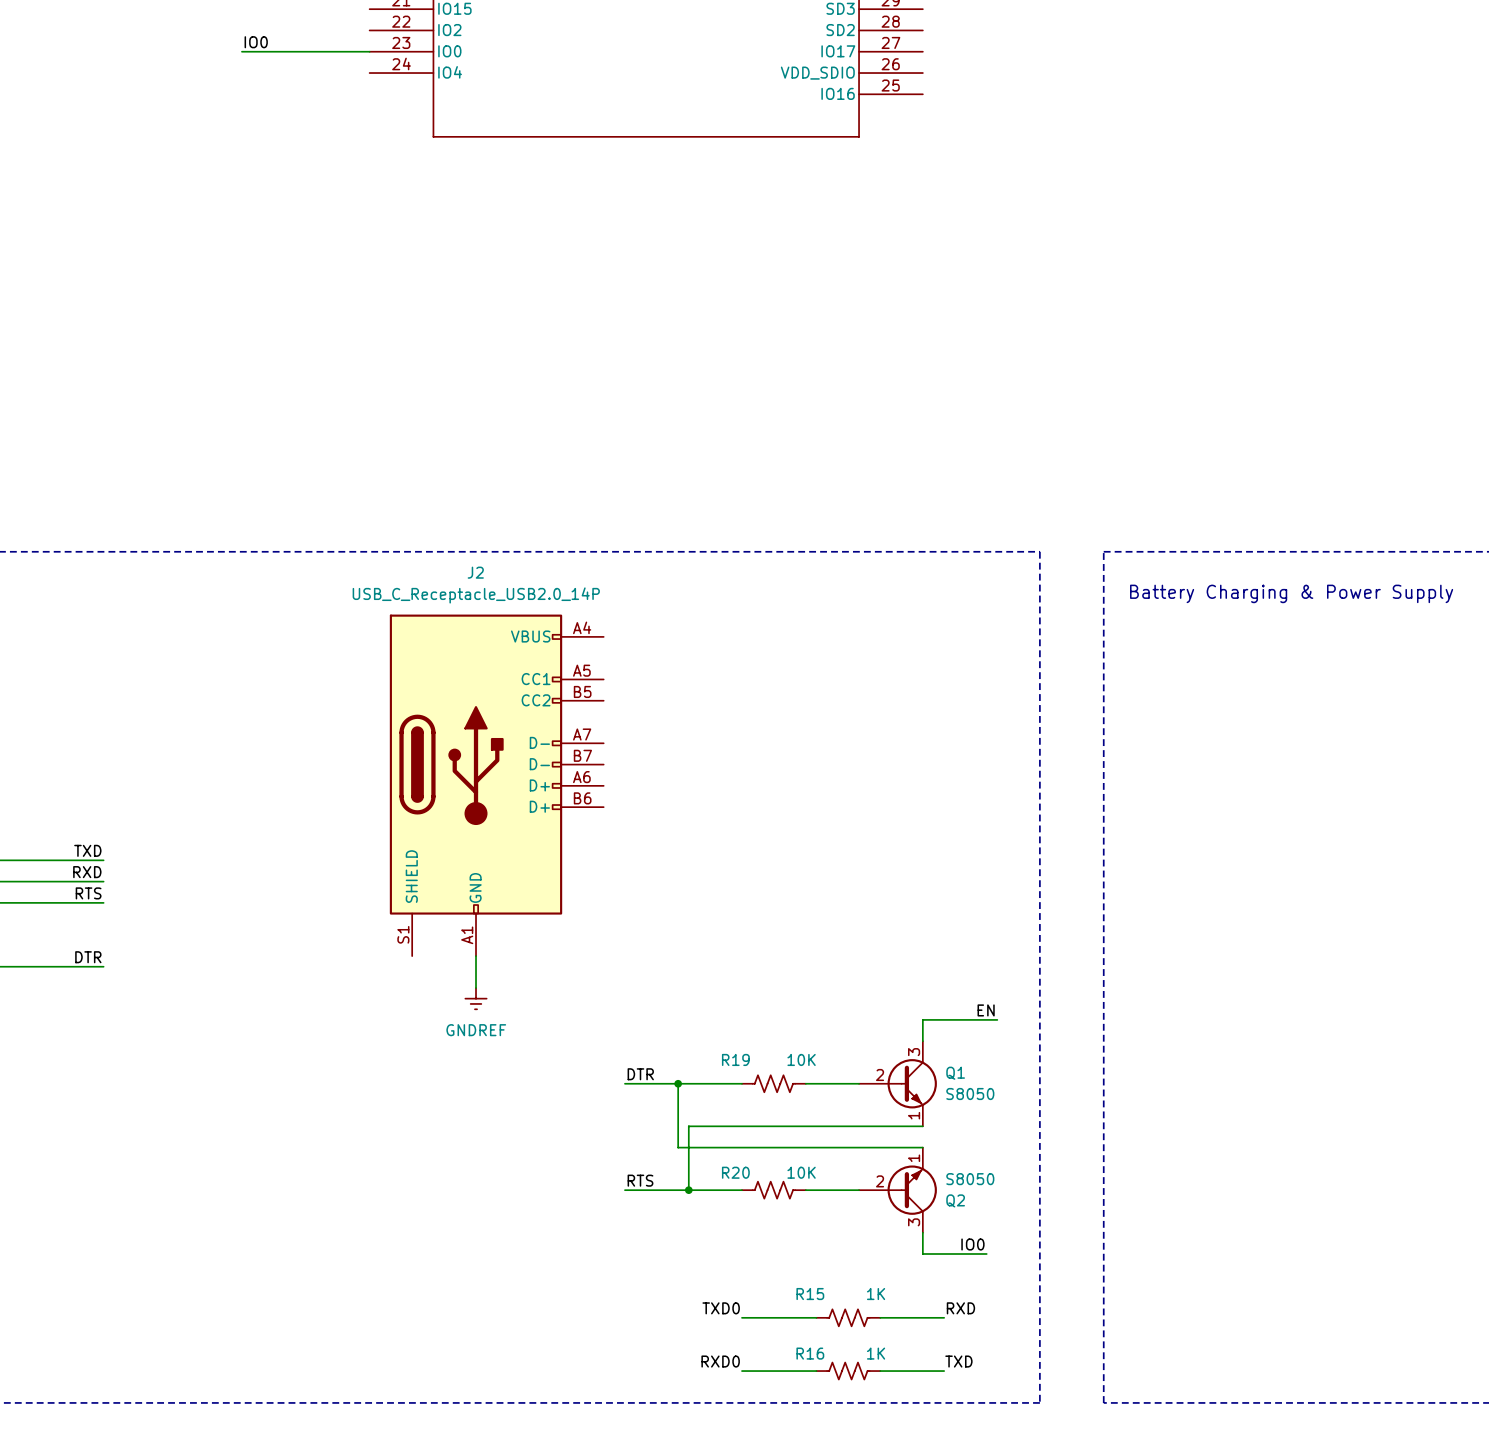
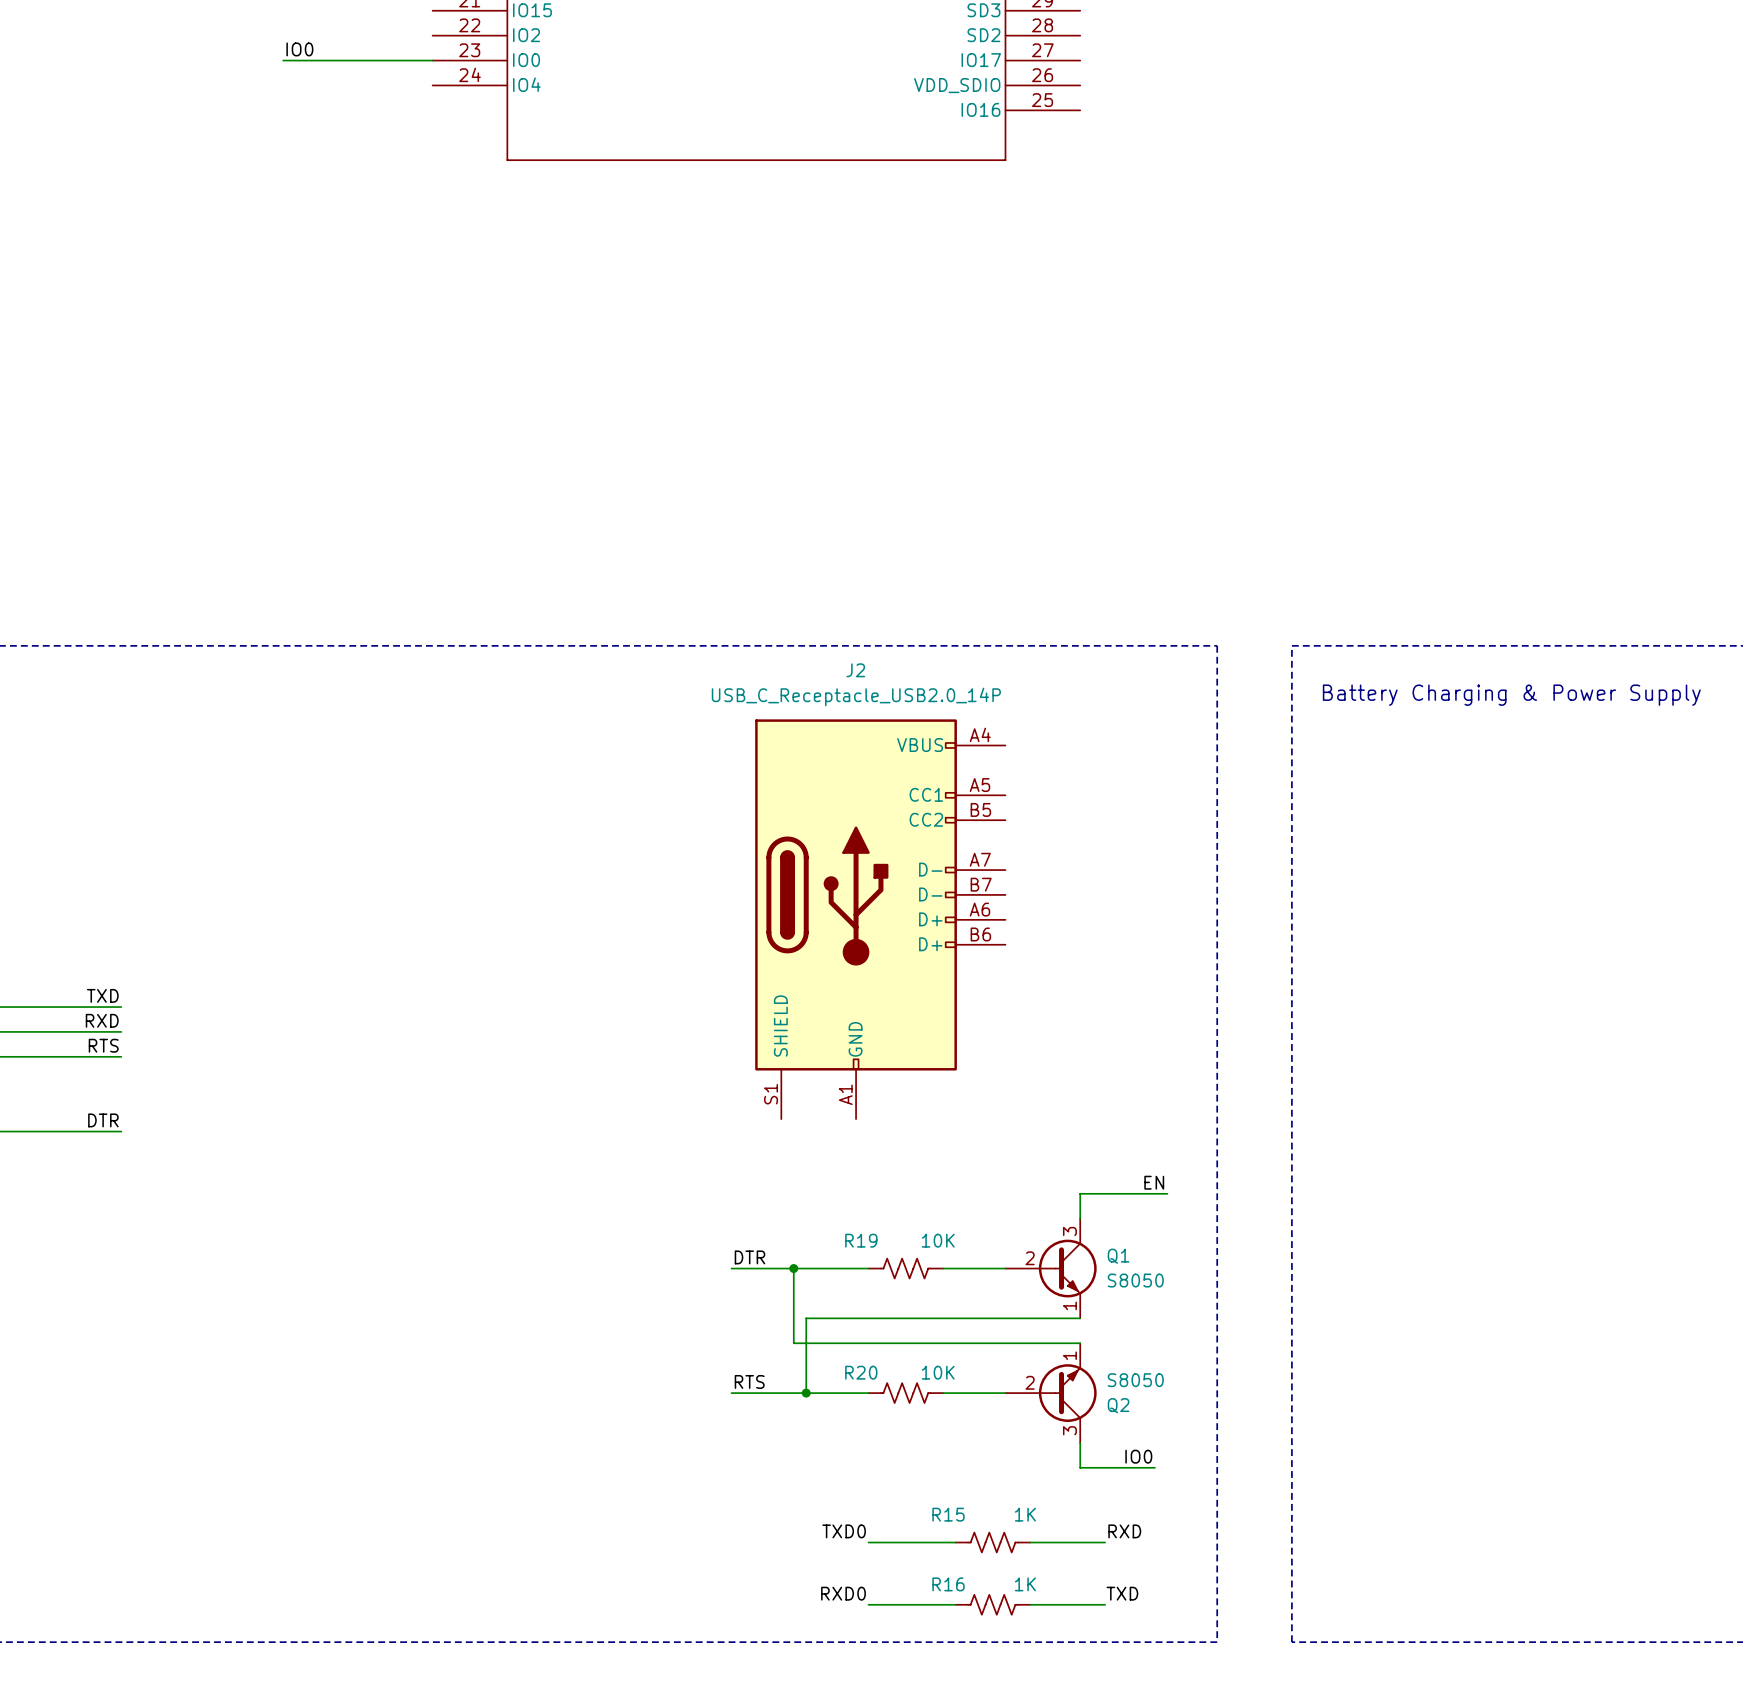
J2 position: (496, 785) -> (880, 919)
wire: (476, 956) (476, 988) -> none
power symbol: GNDREF (476, 998) -> none

